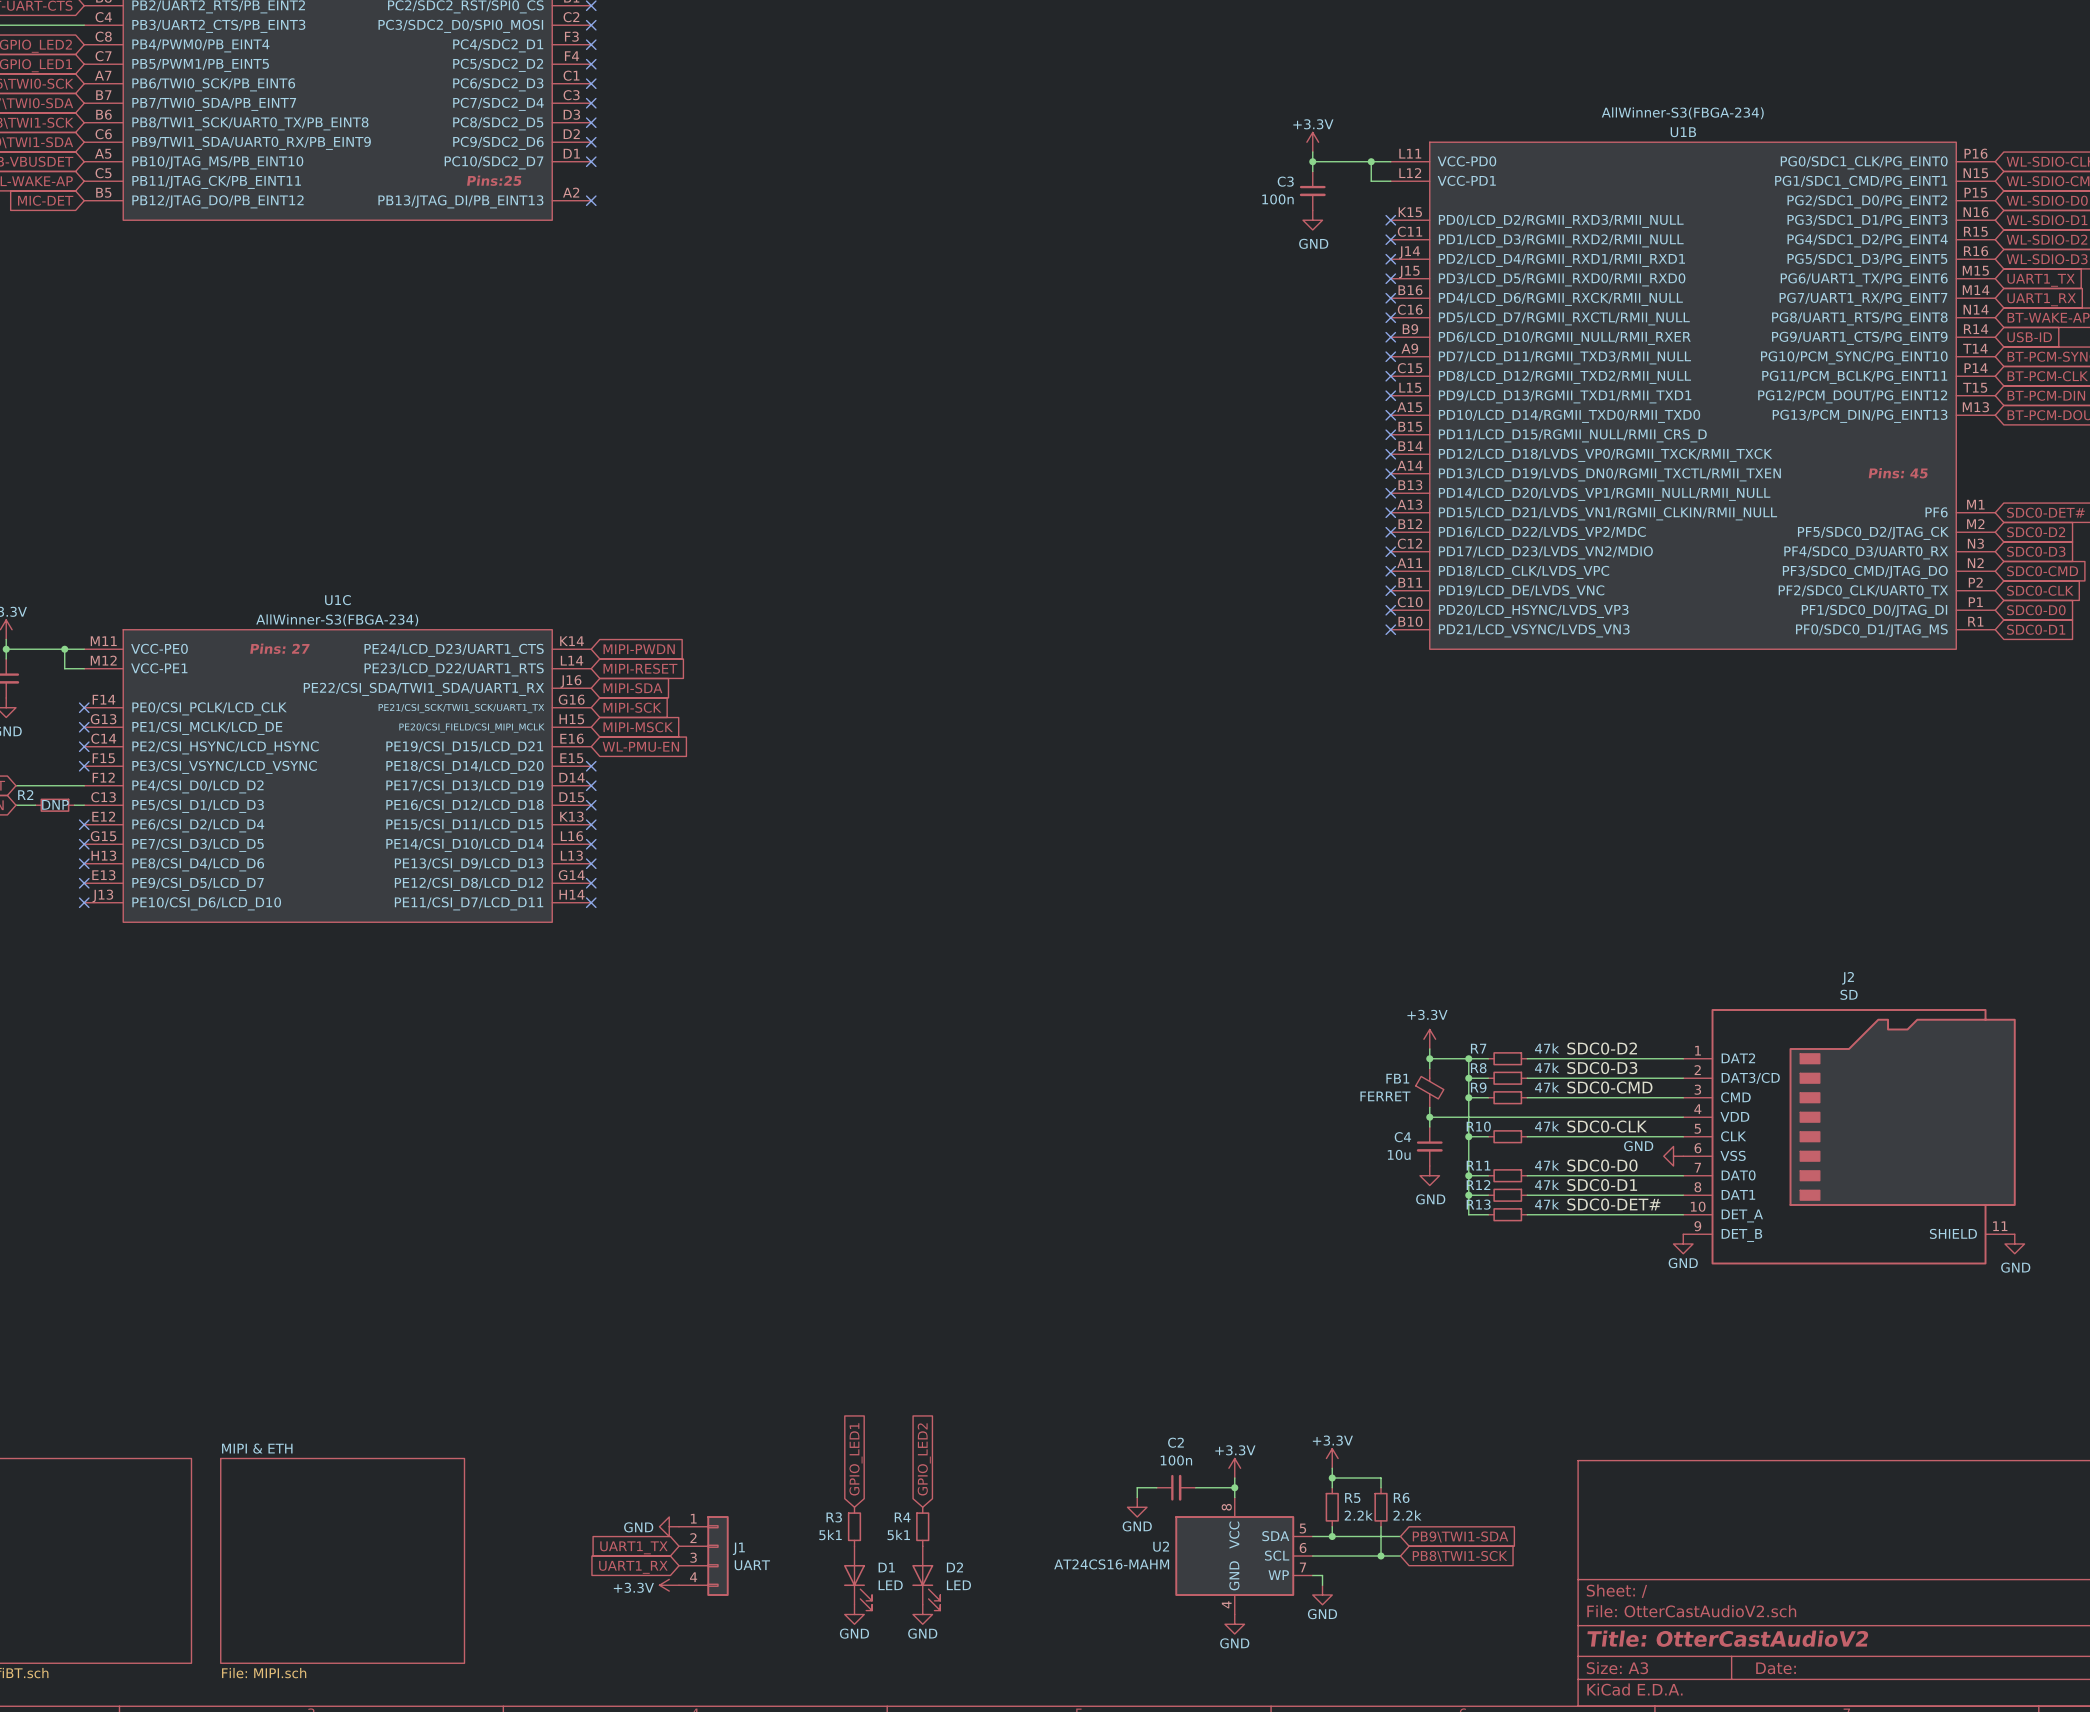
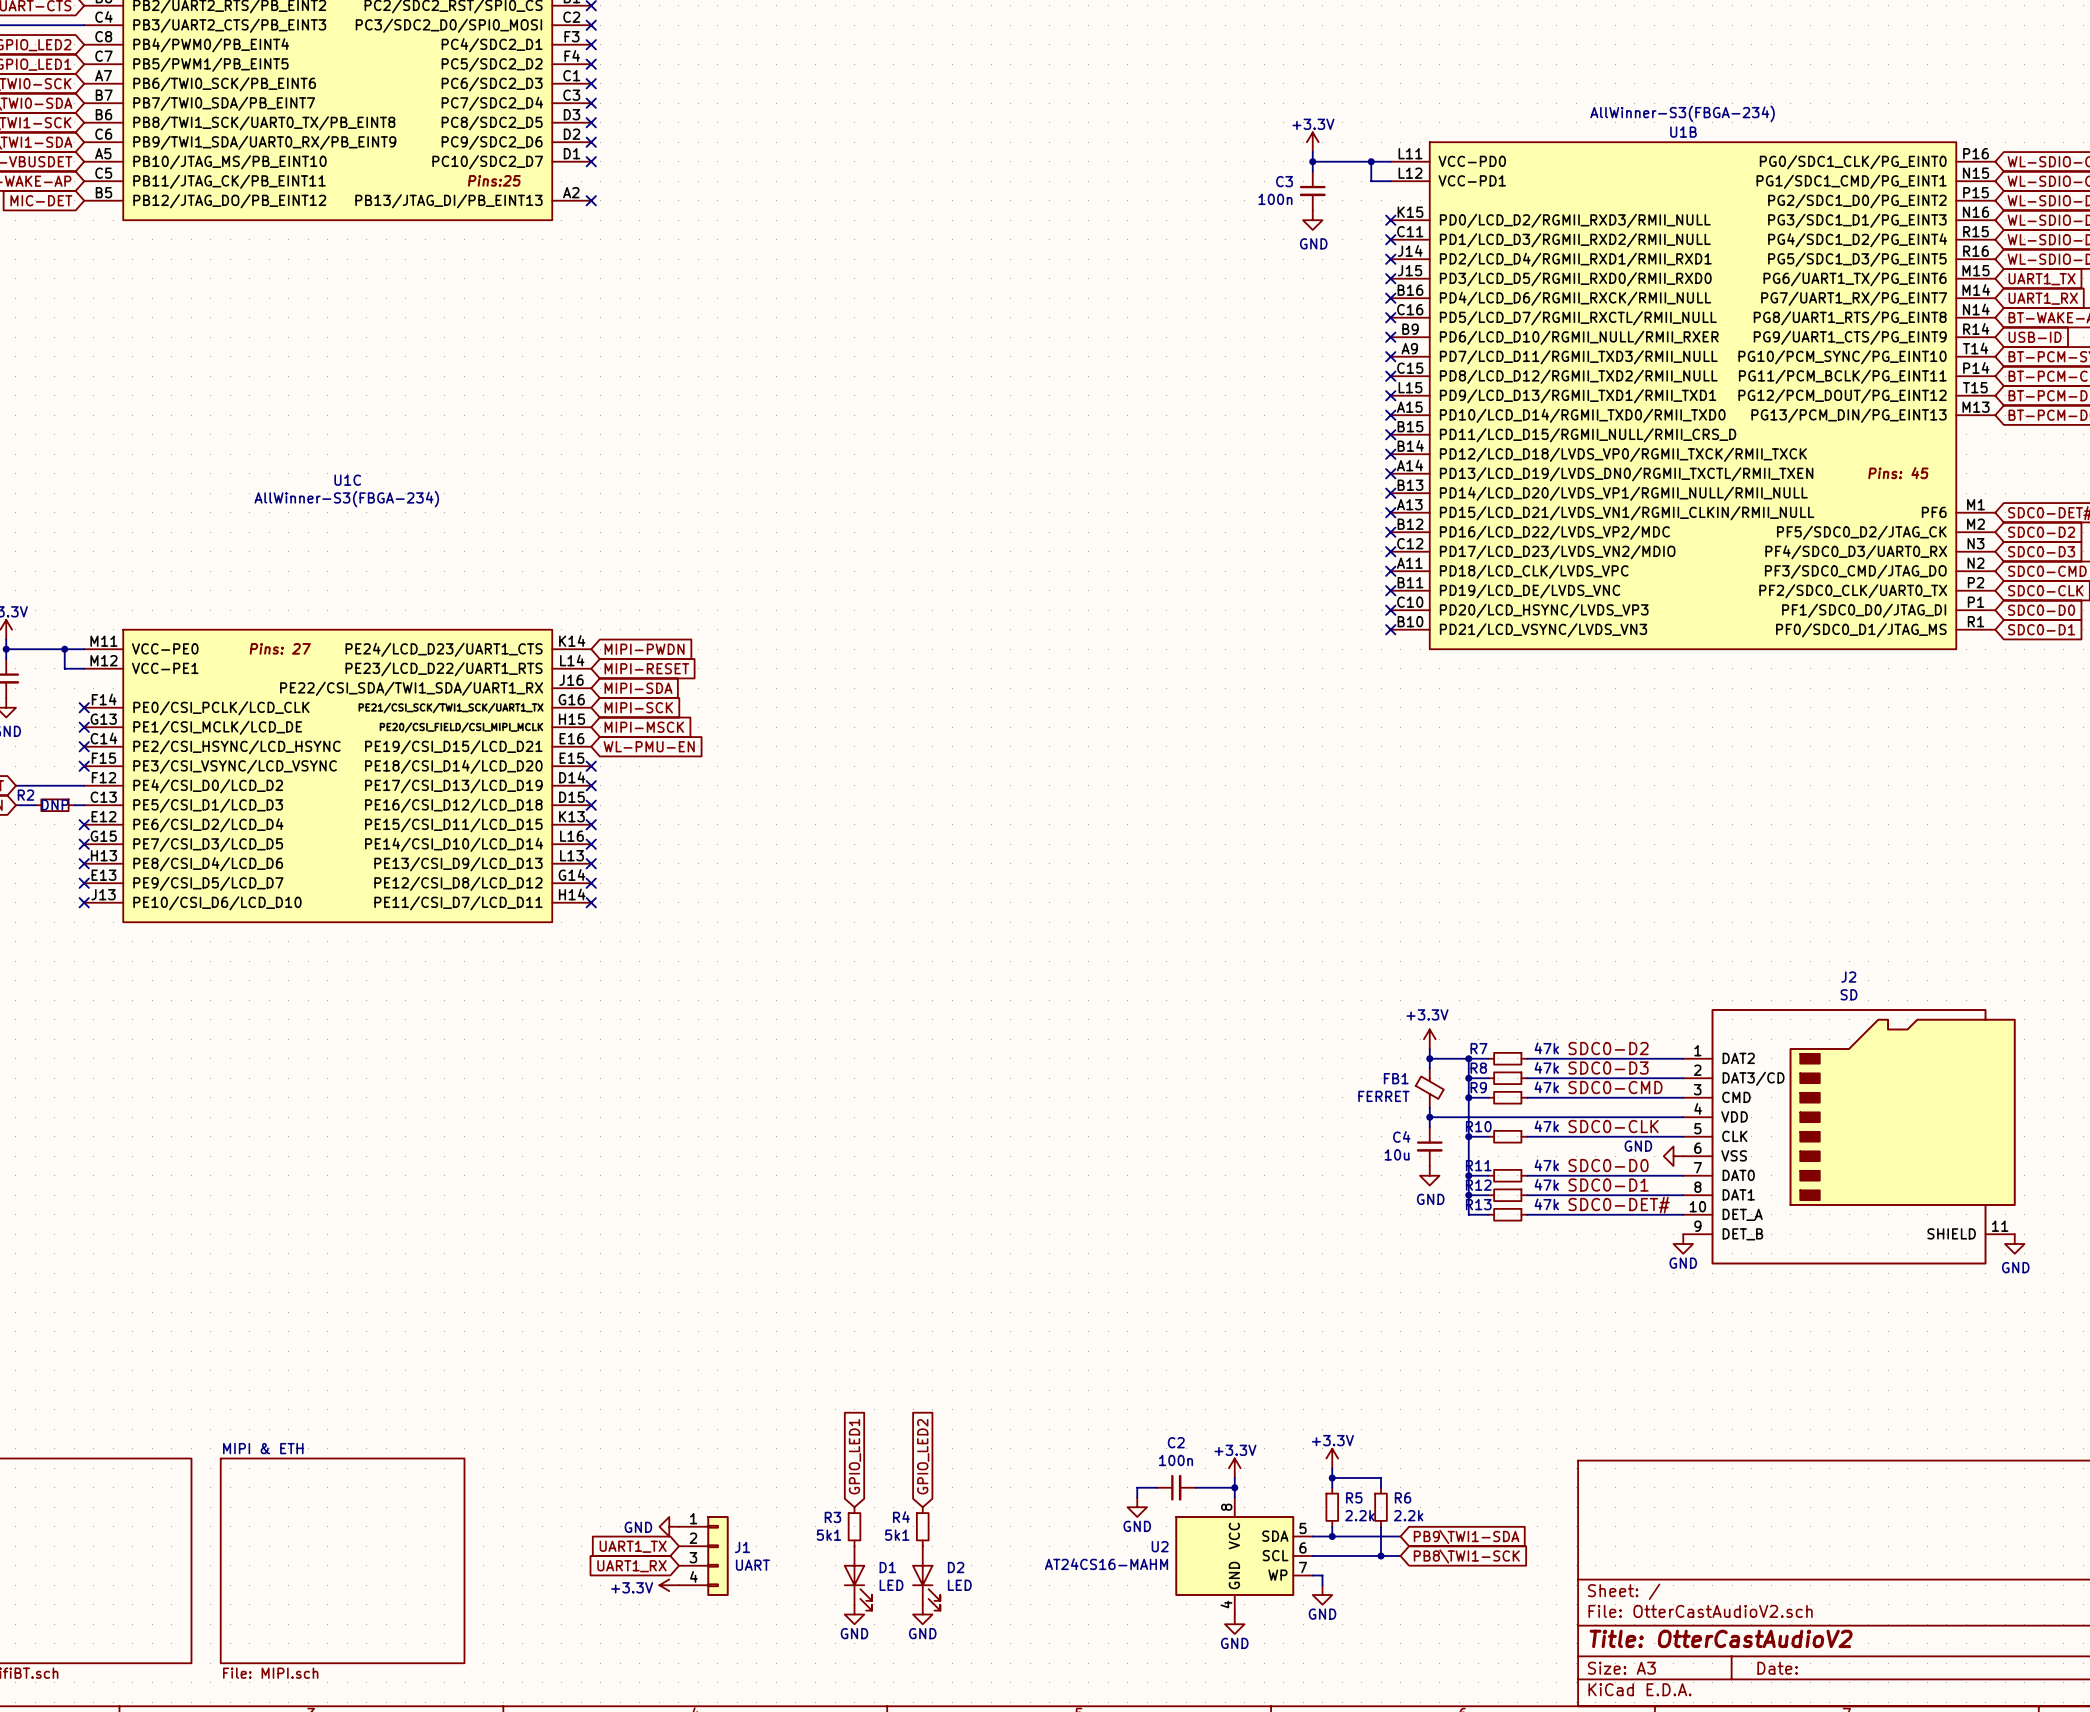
U1C name position: U1C (337, 600) -> U1C (347, 480)
U1C value position: AllWinner-S3(FBGA-234) (337, 620) -> AllWinner-S3(FBGA-234) (346, 499)

